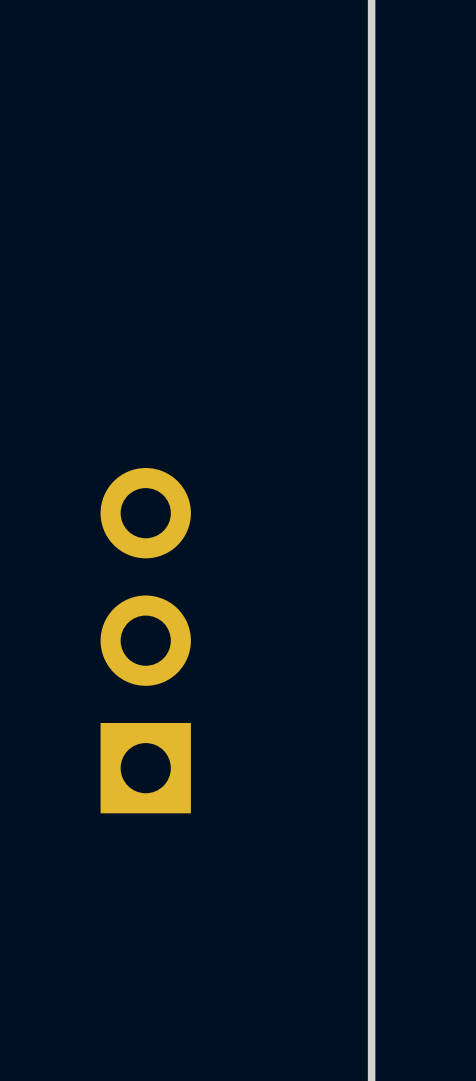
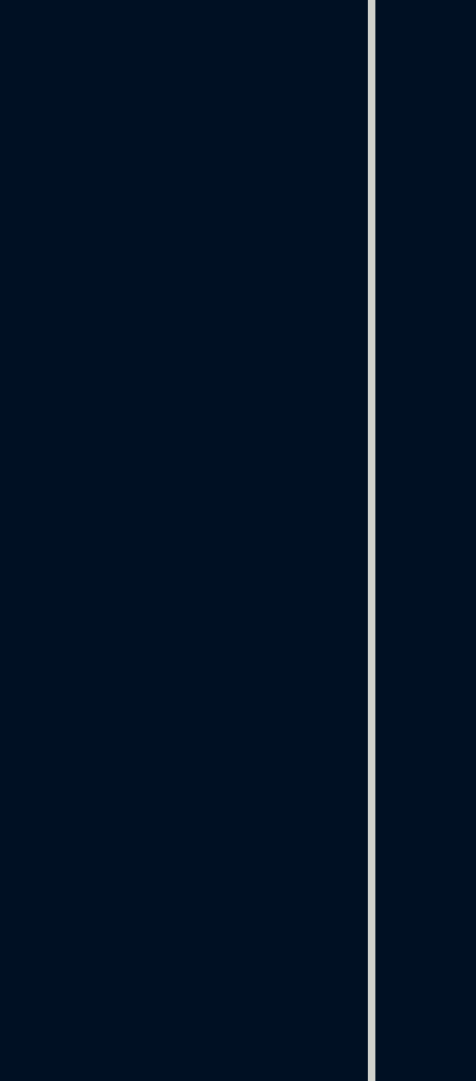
part: (145, 640) -> none

